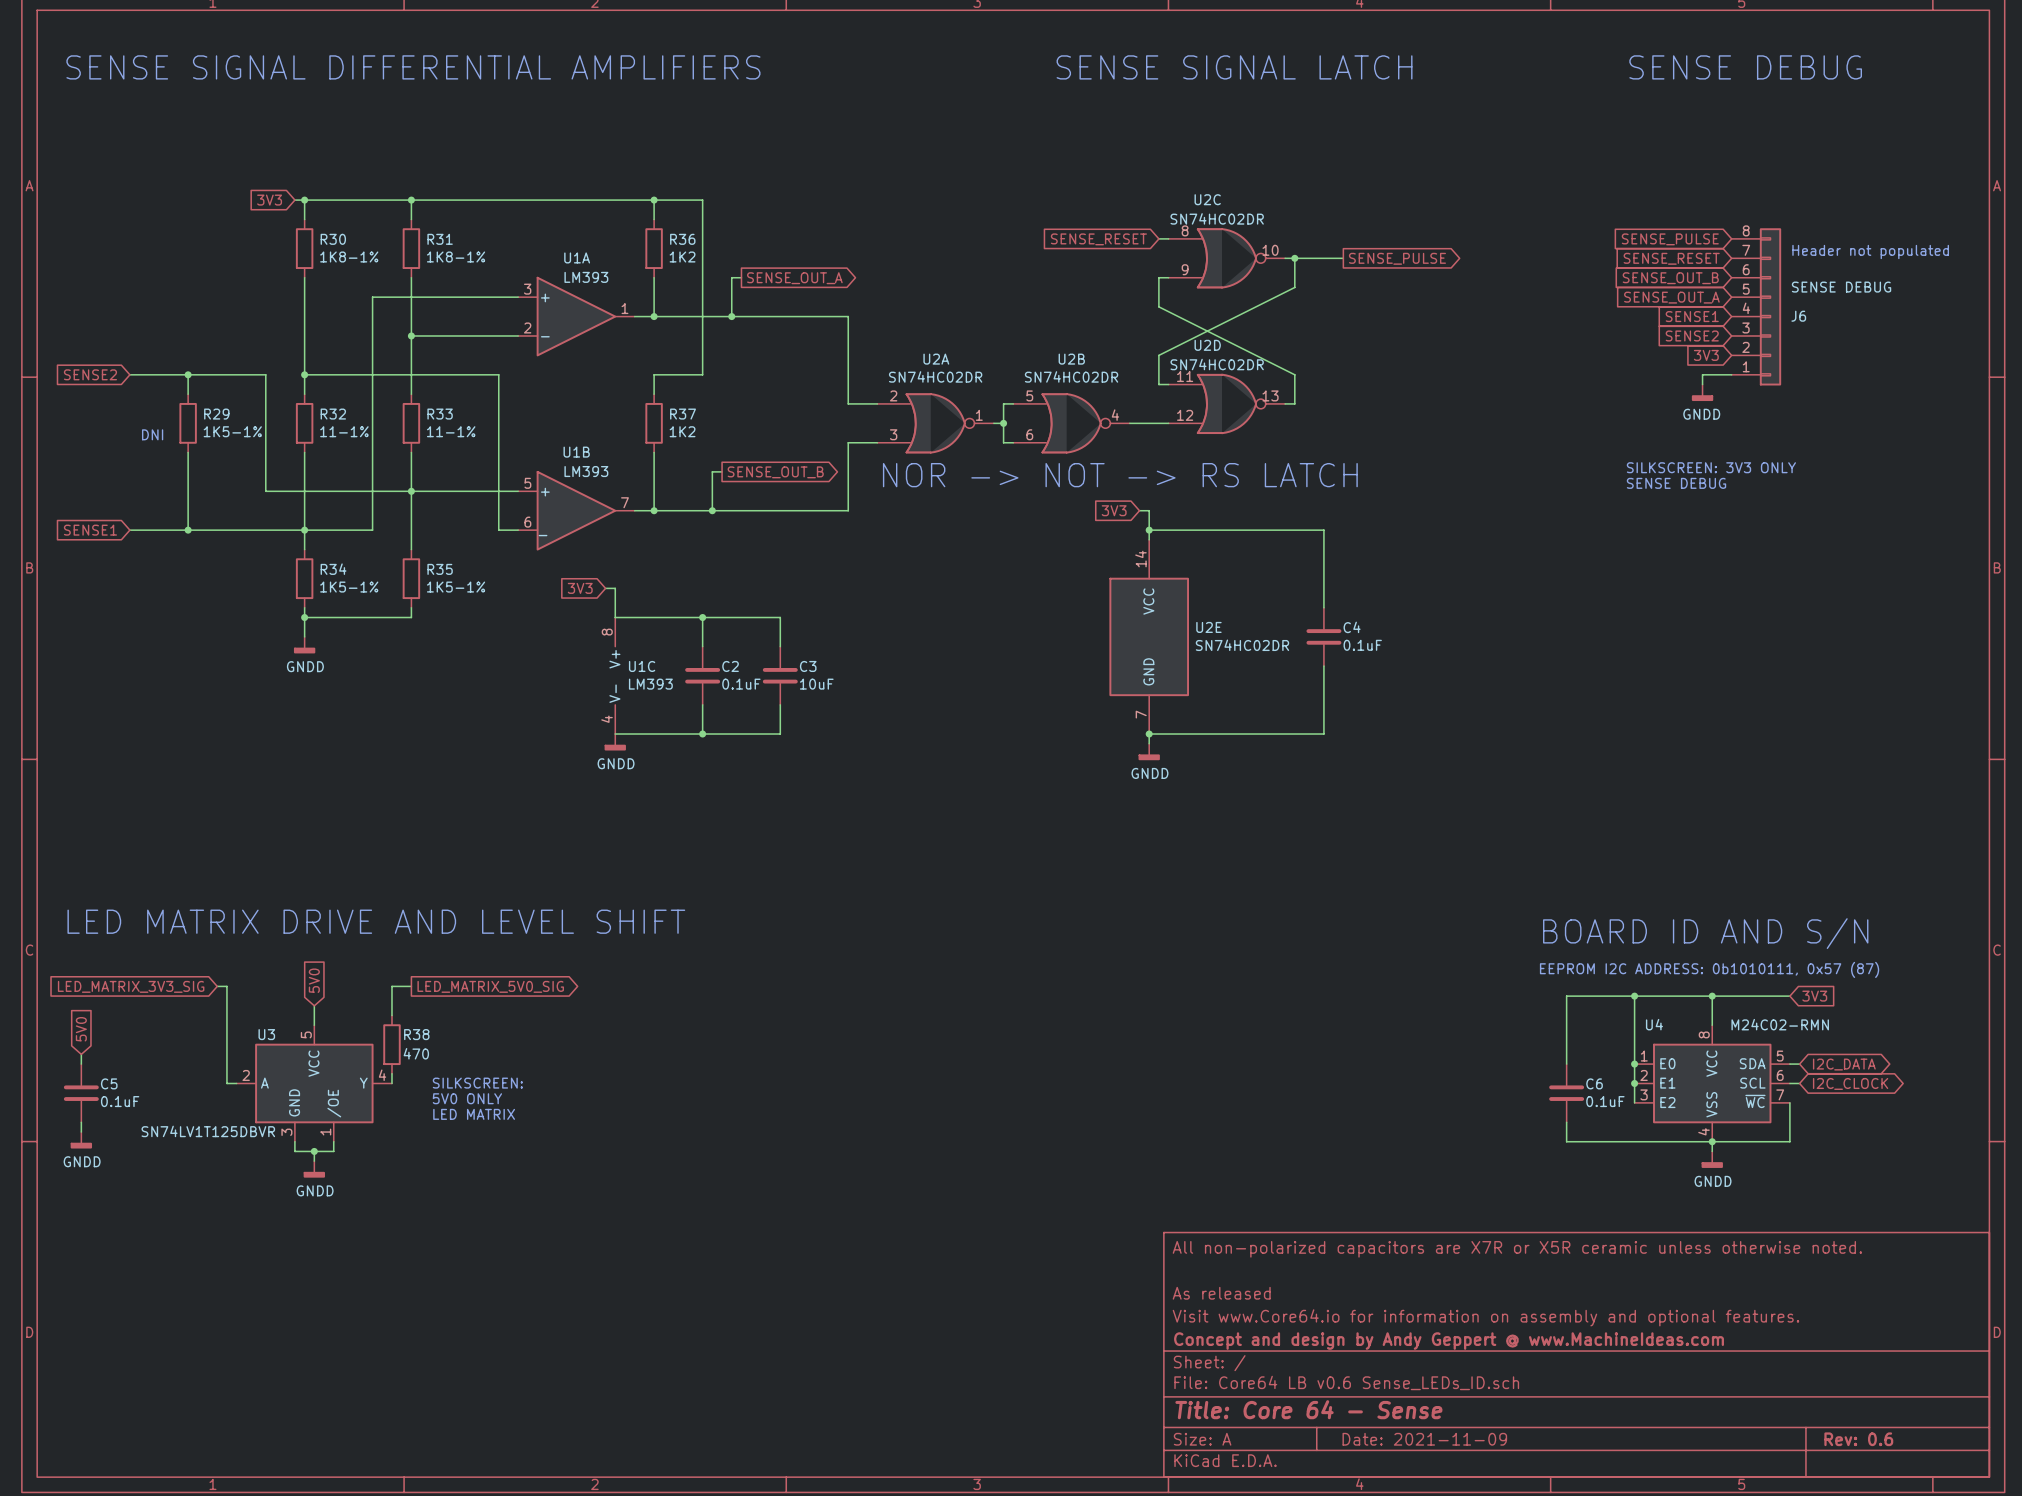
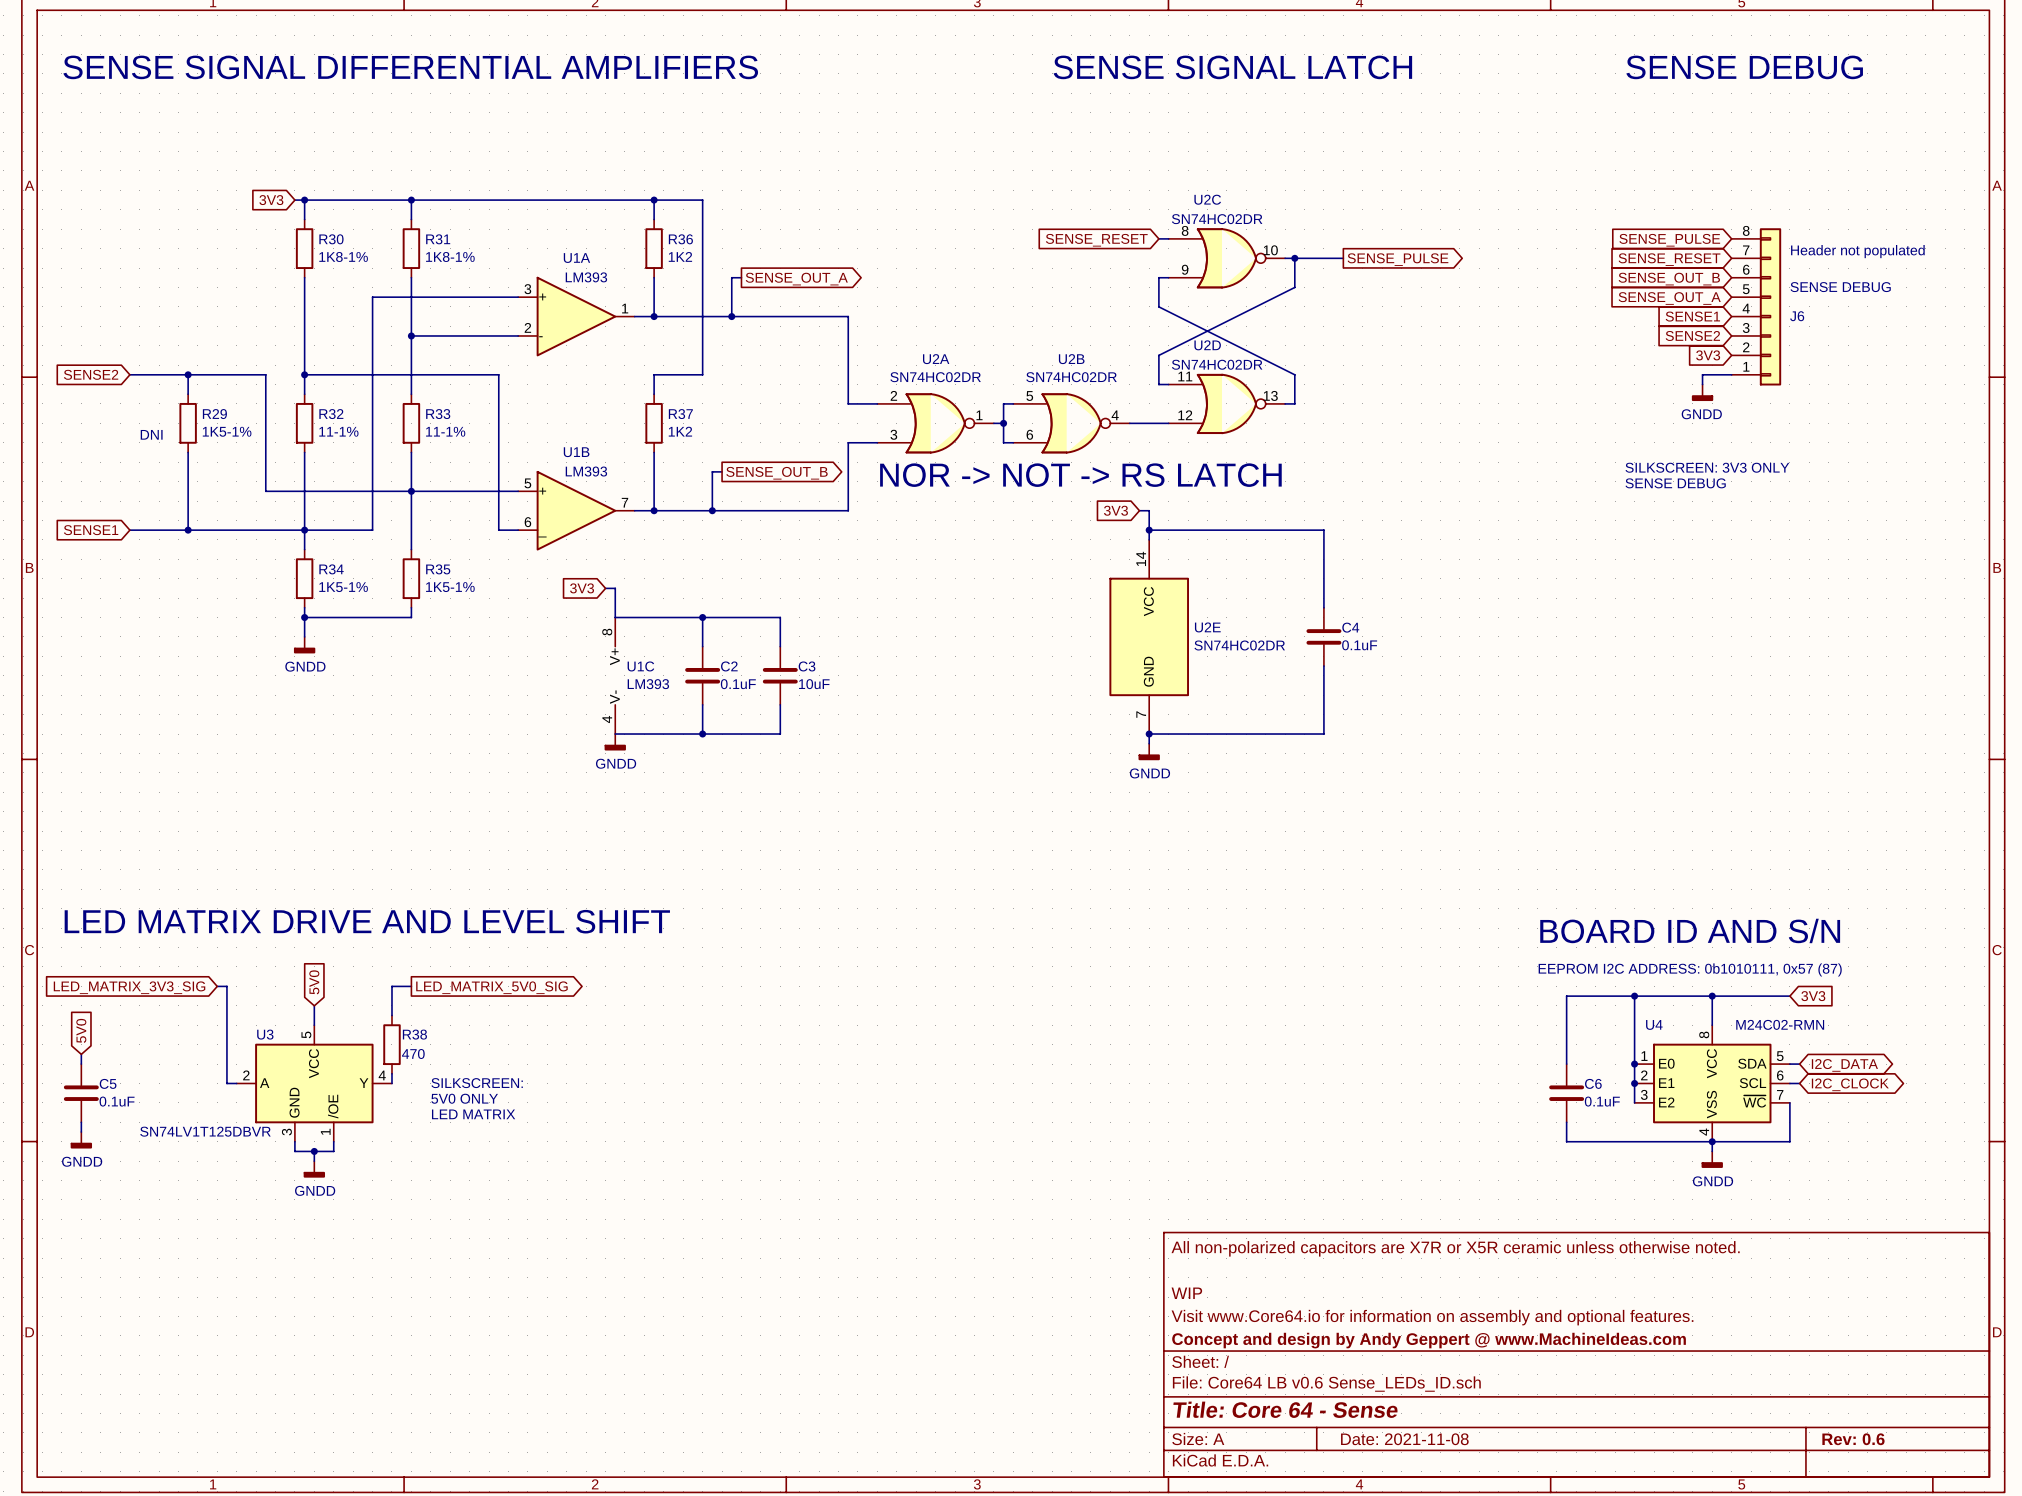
title block: As released (1221, 1293) -> WIP (1186, 1293)
title block: Date: 2021-11-09 (1424, 1439) -> Date: 2021-11-08 (1404, 1439)

